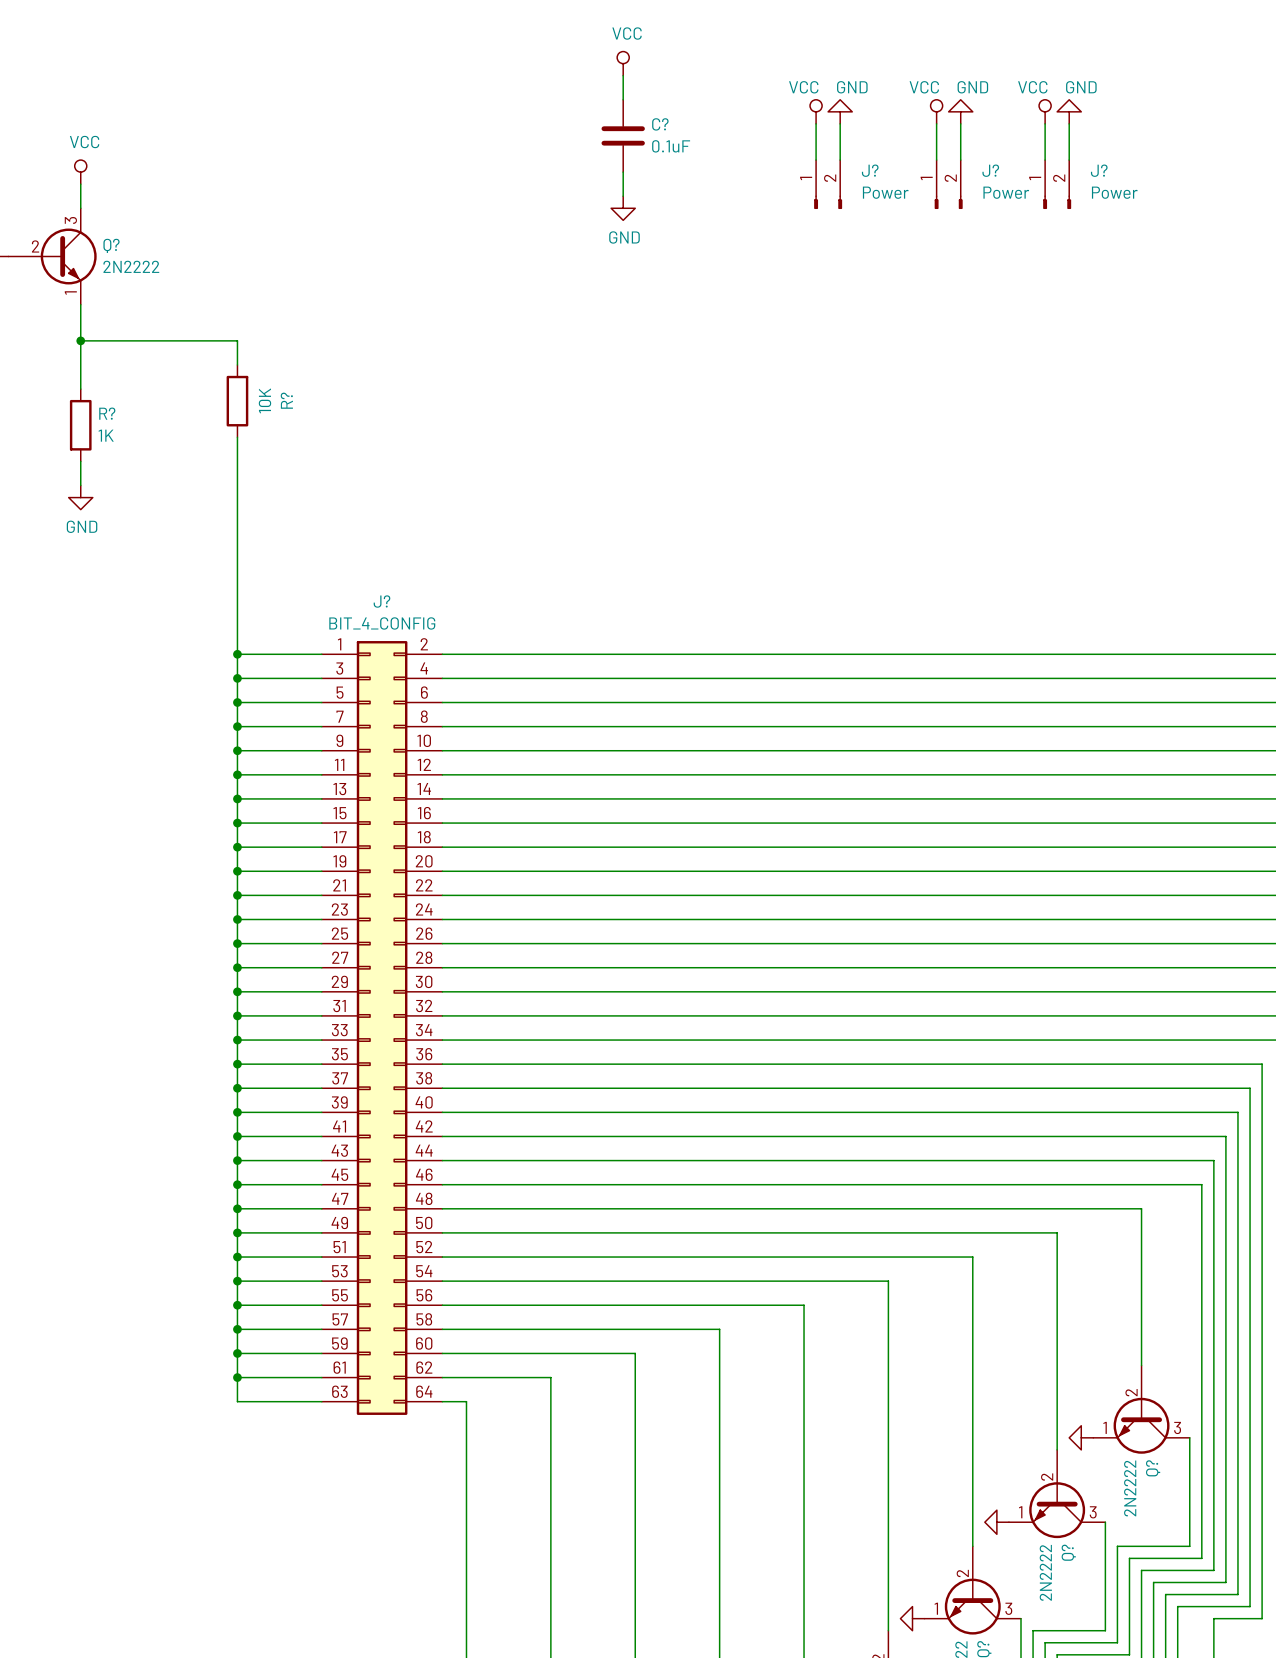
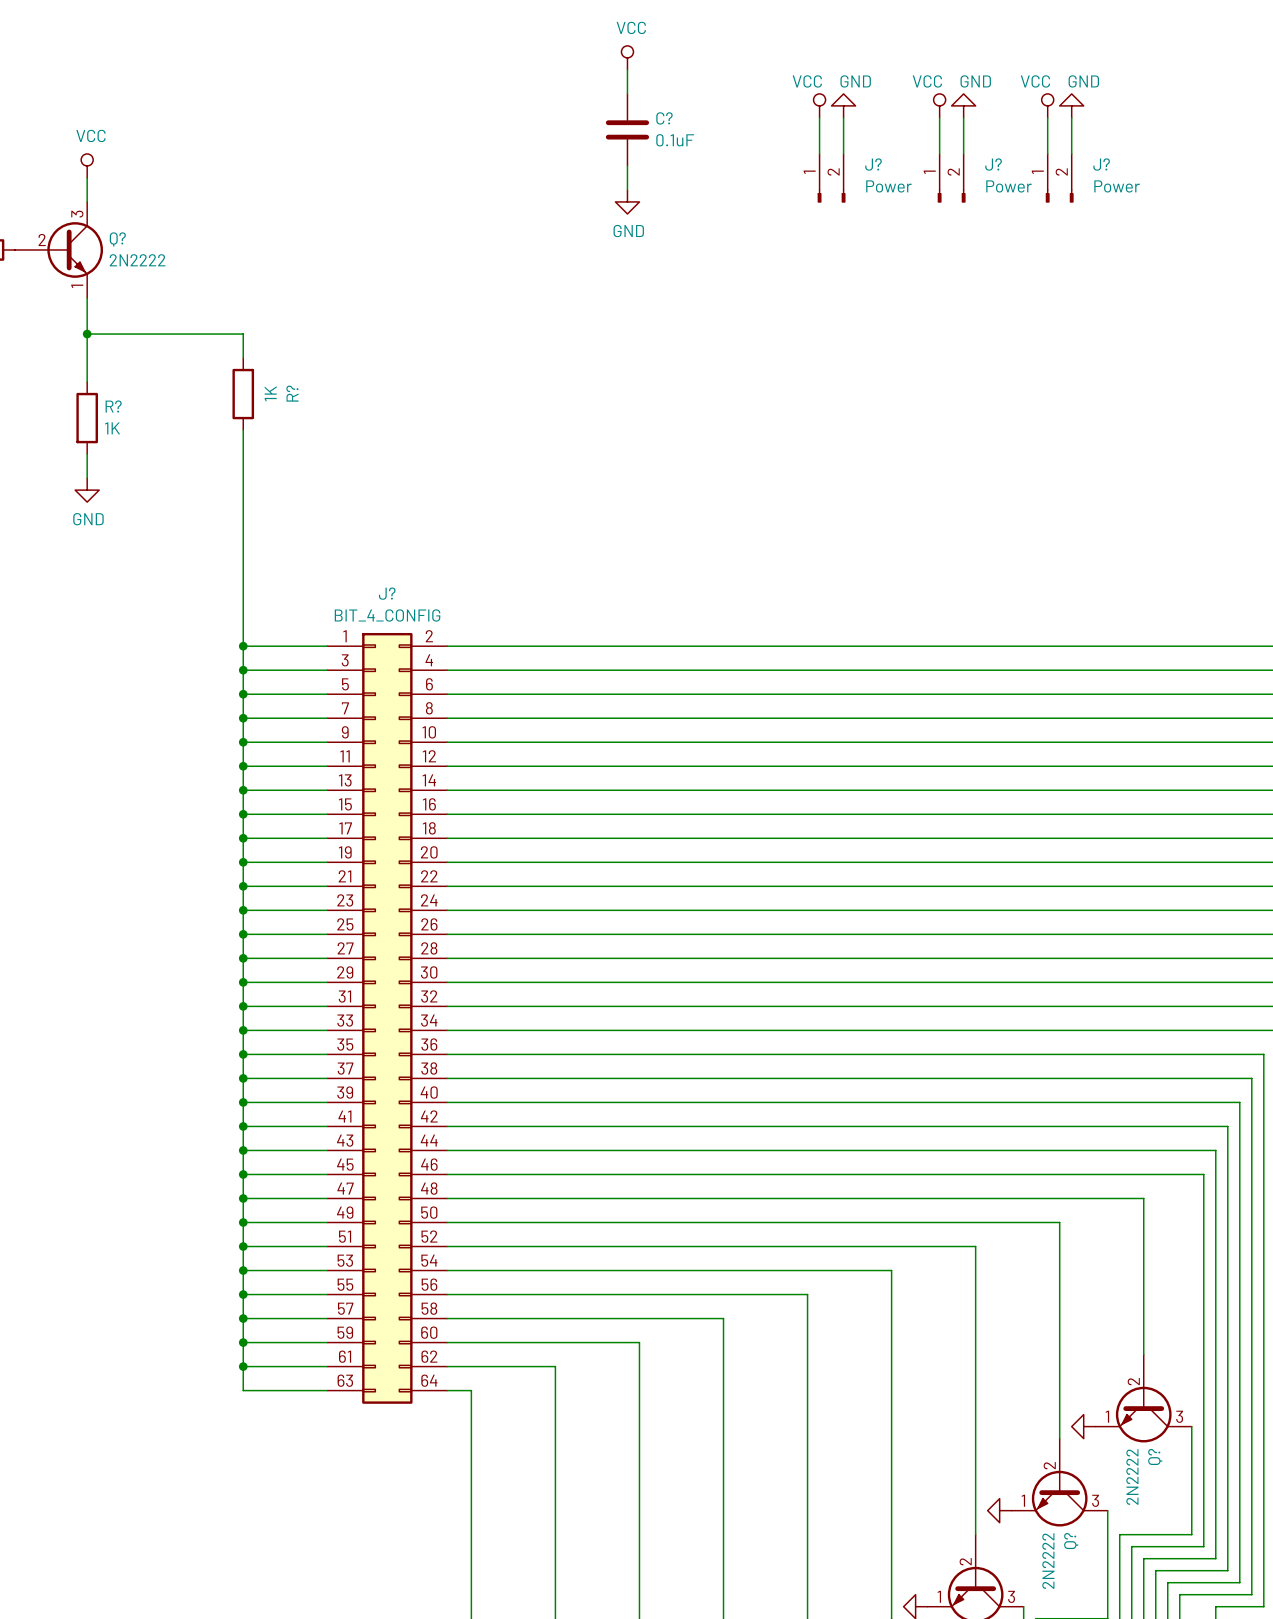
R? value: 10K (264, 400) -> 1K (270, 393)

